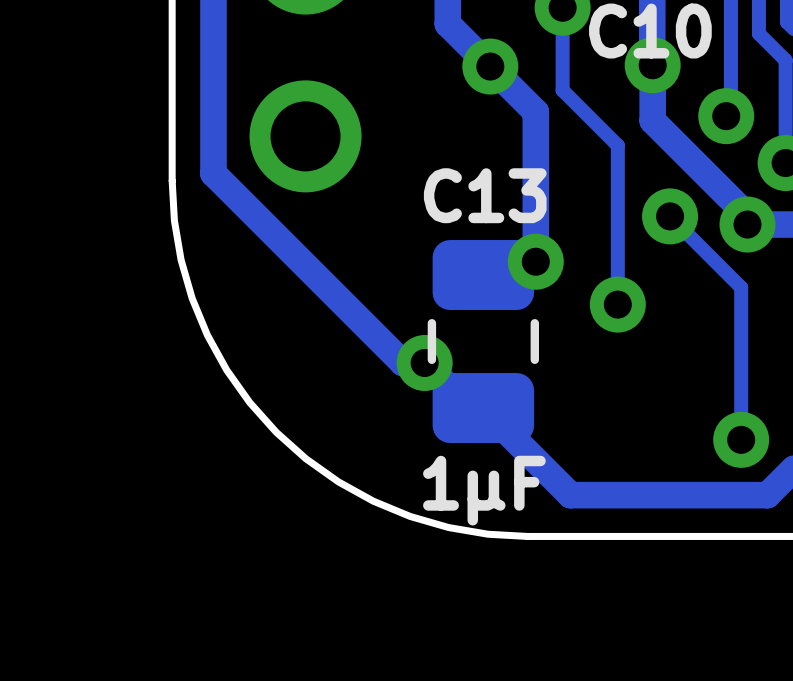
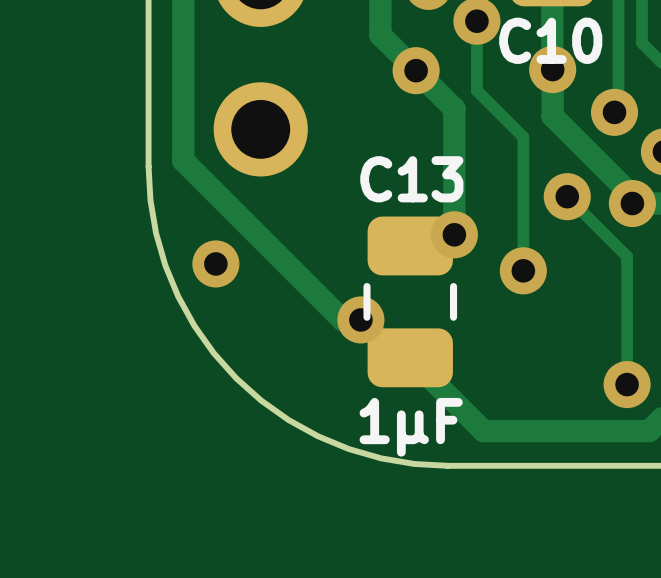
via: none -> (215, 263)

